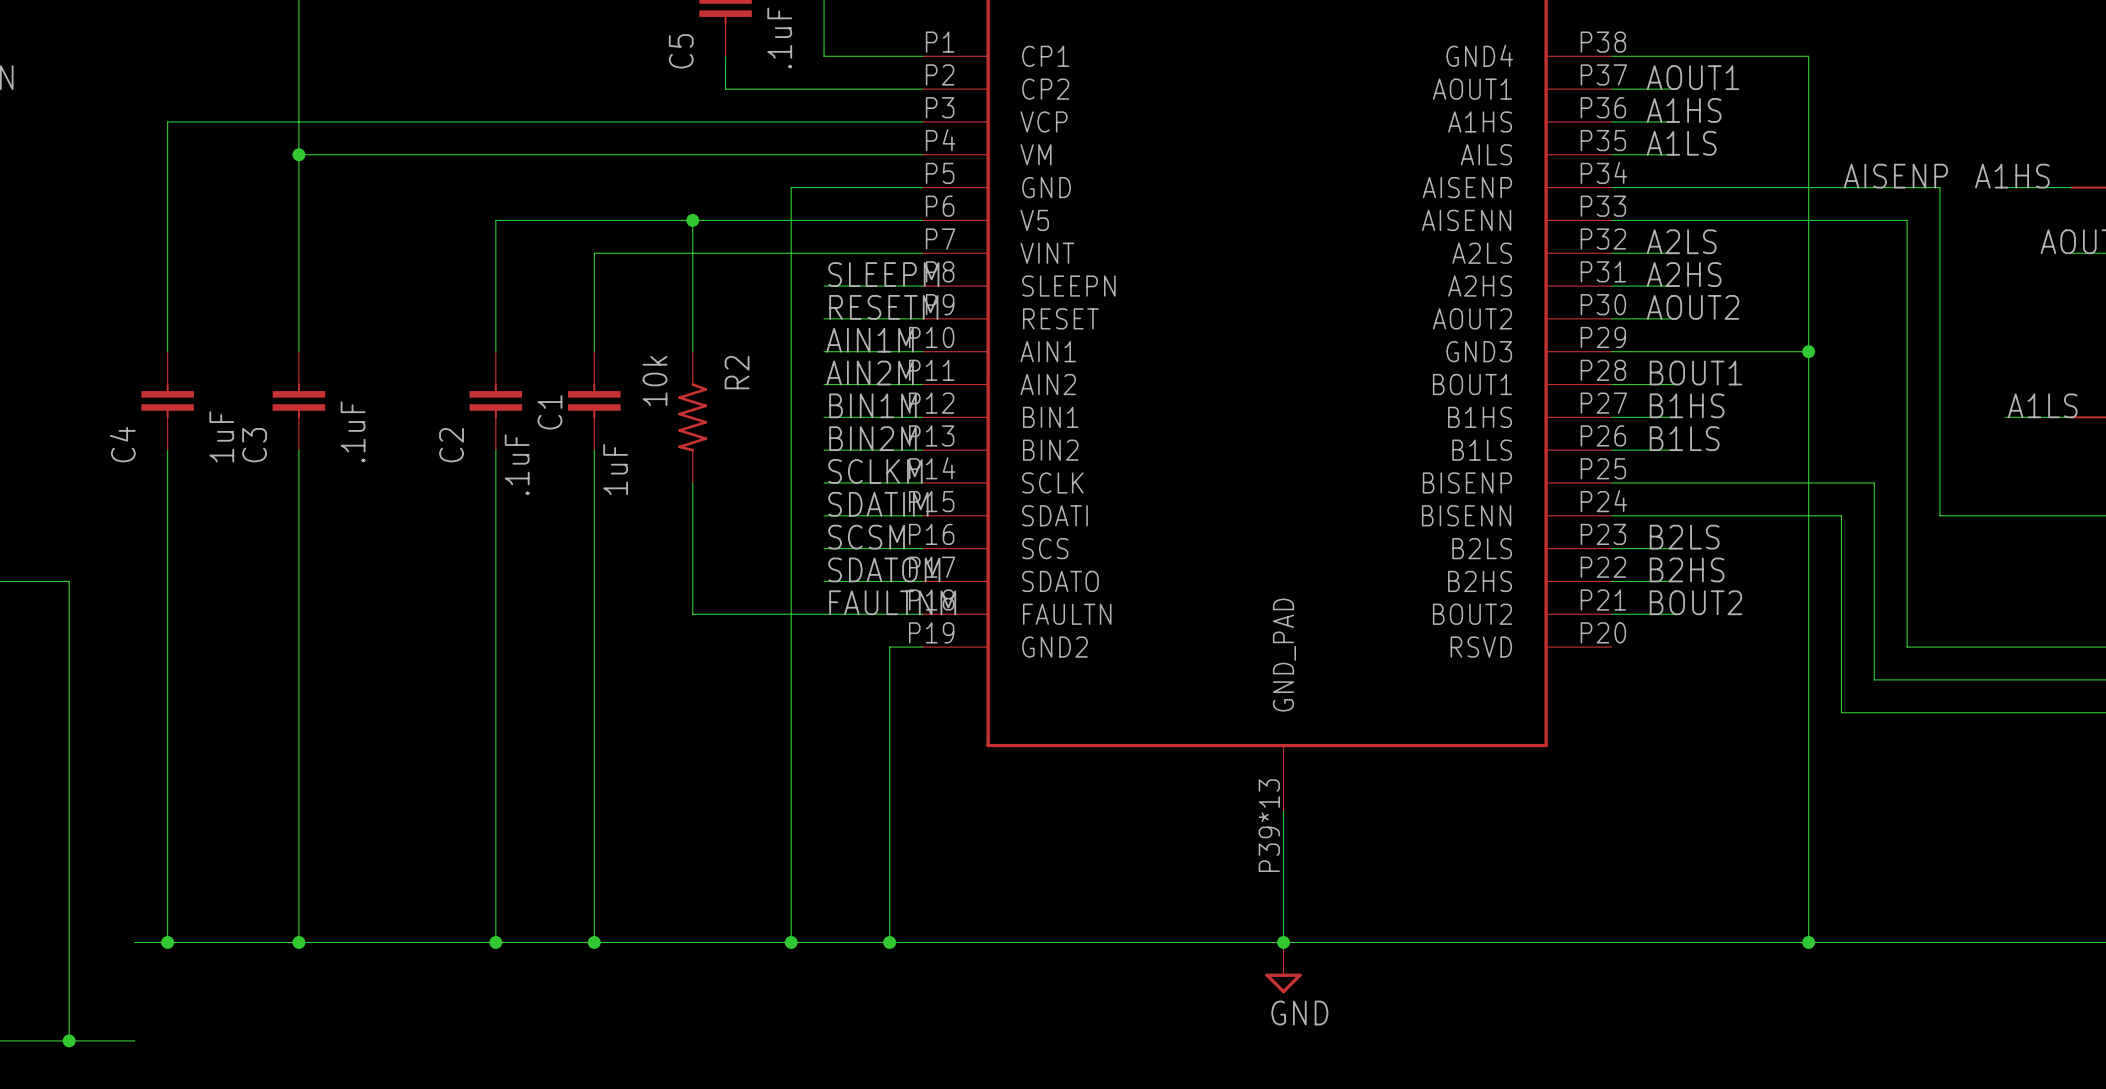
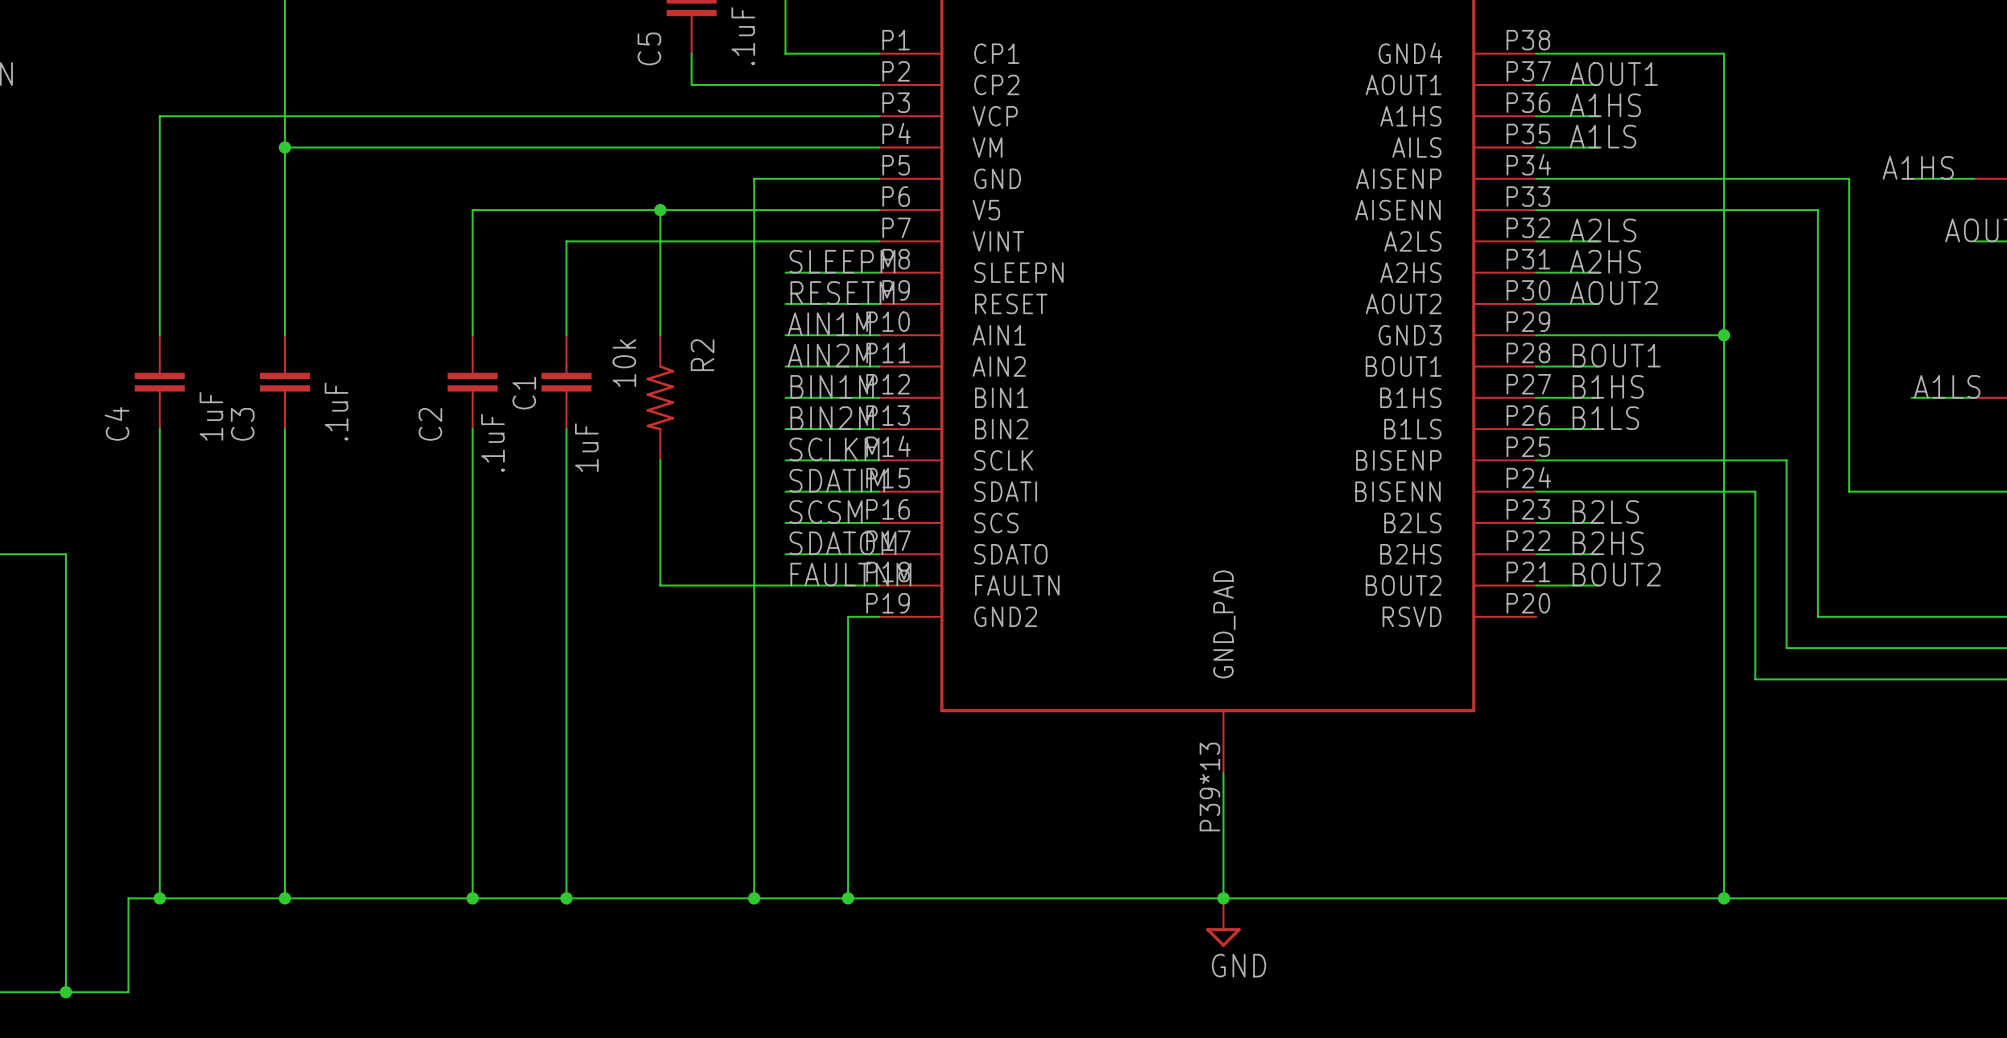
label: AISENP (1895, 176) -> none
wire: none -> (128, 898) (128, 992)

